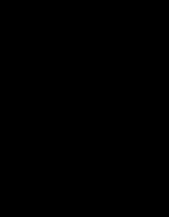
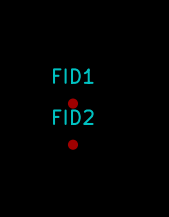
FID1: none -> (72, 103)
FID2: none -> (72, 144)

